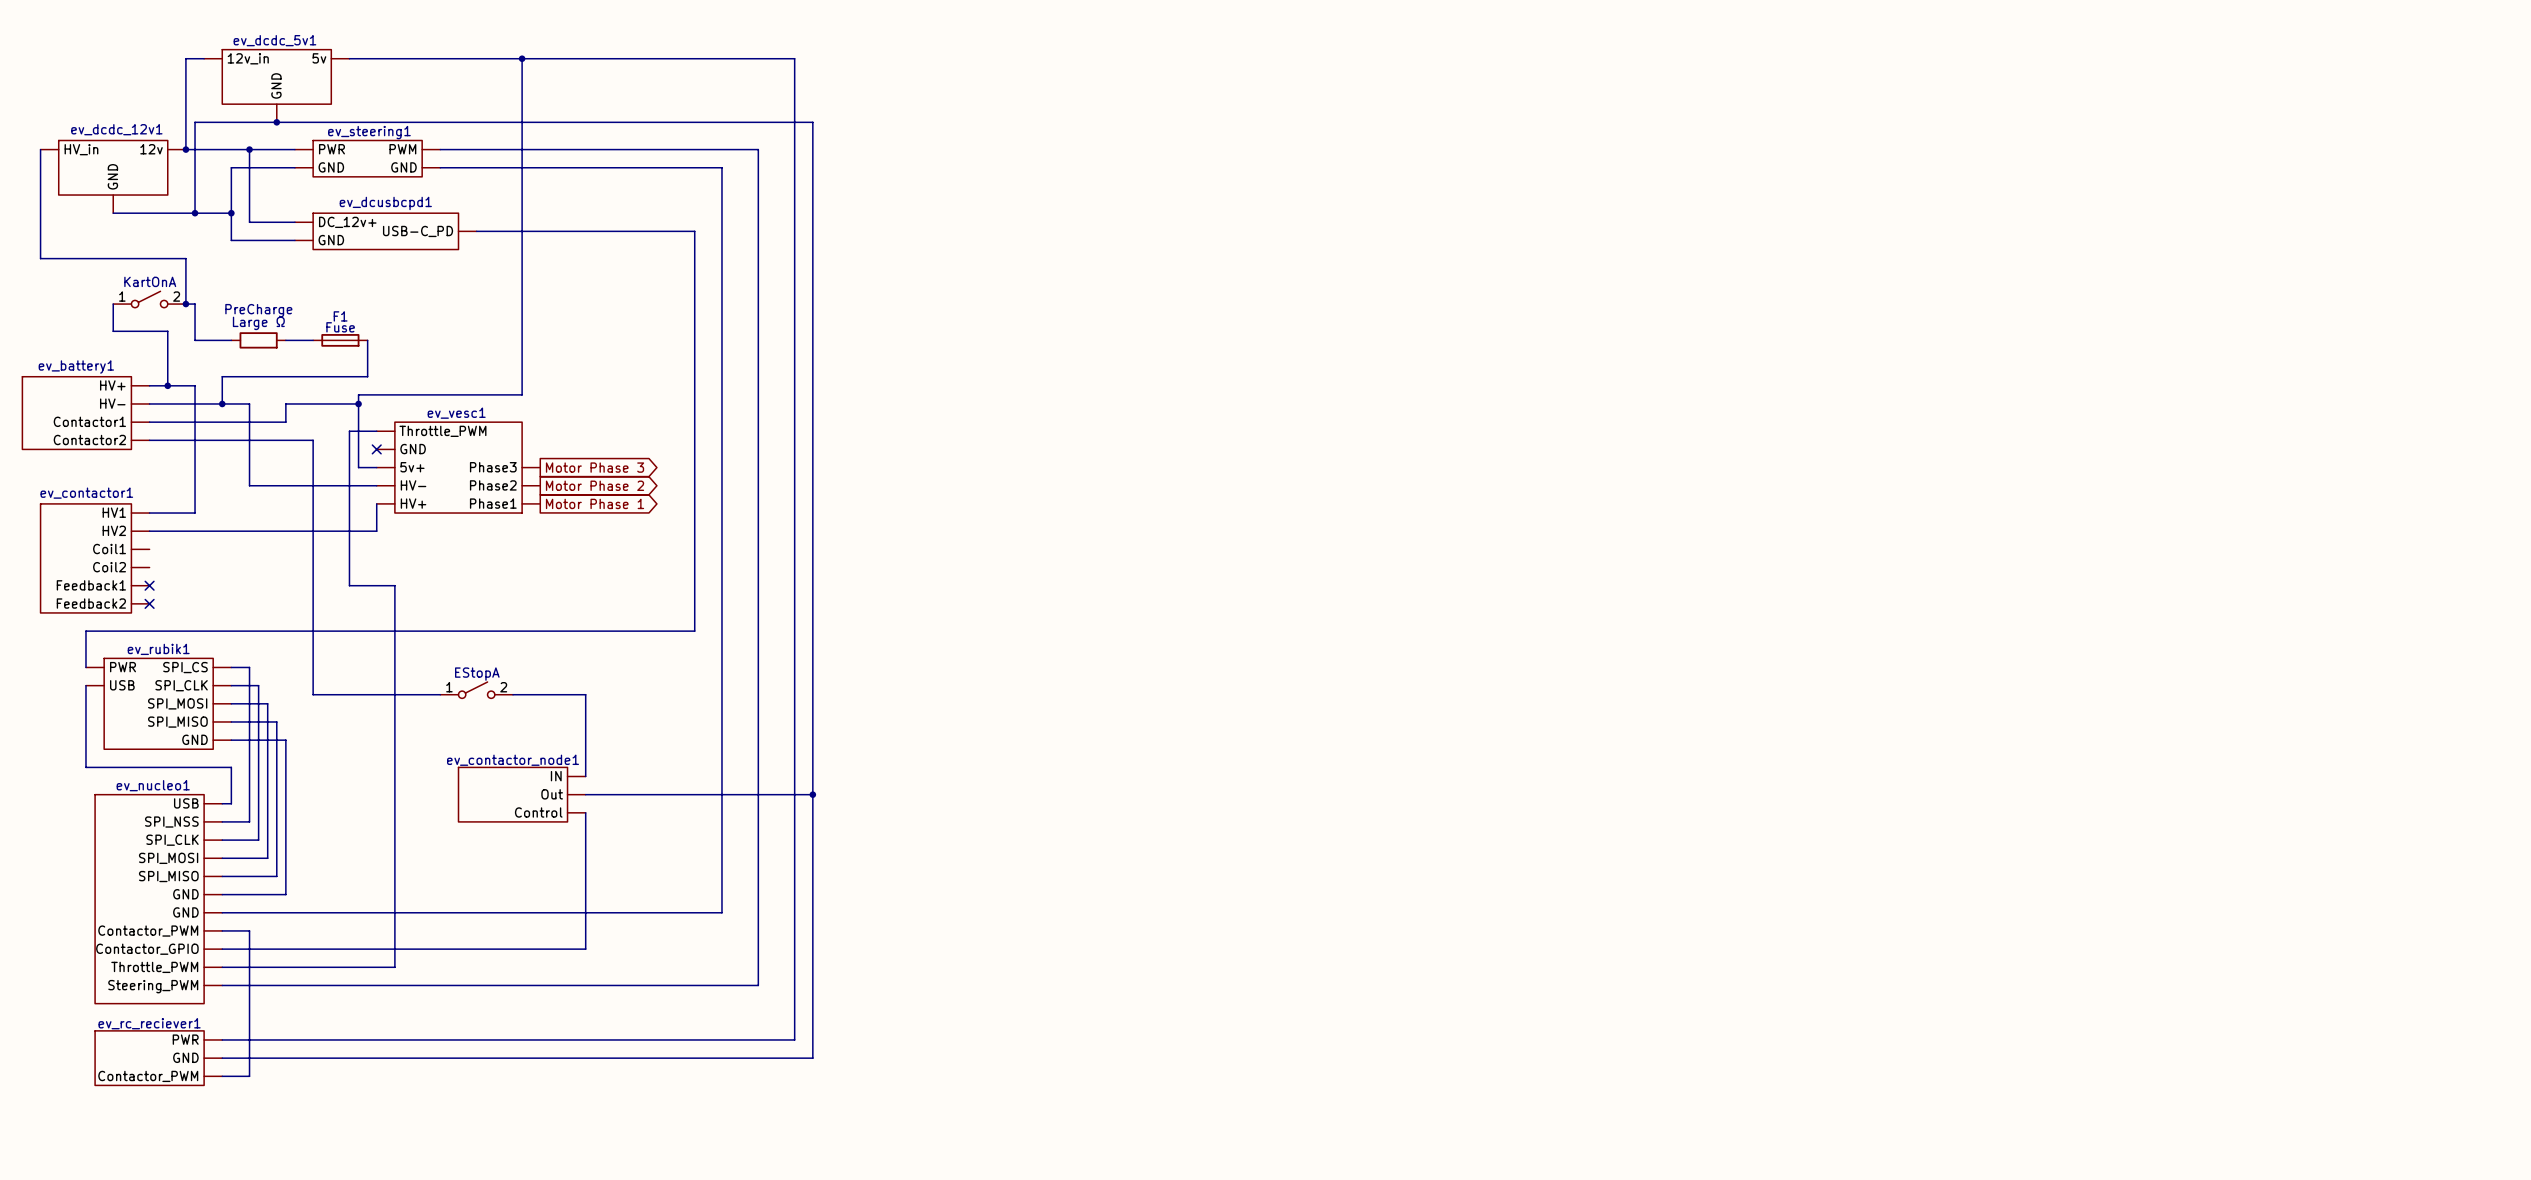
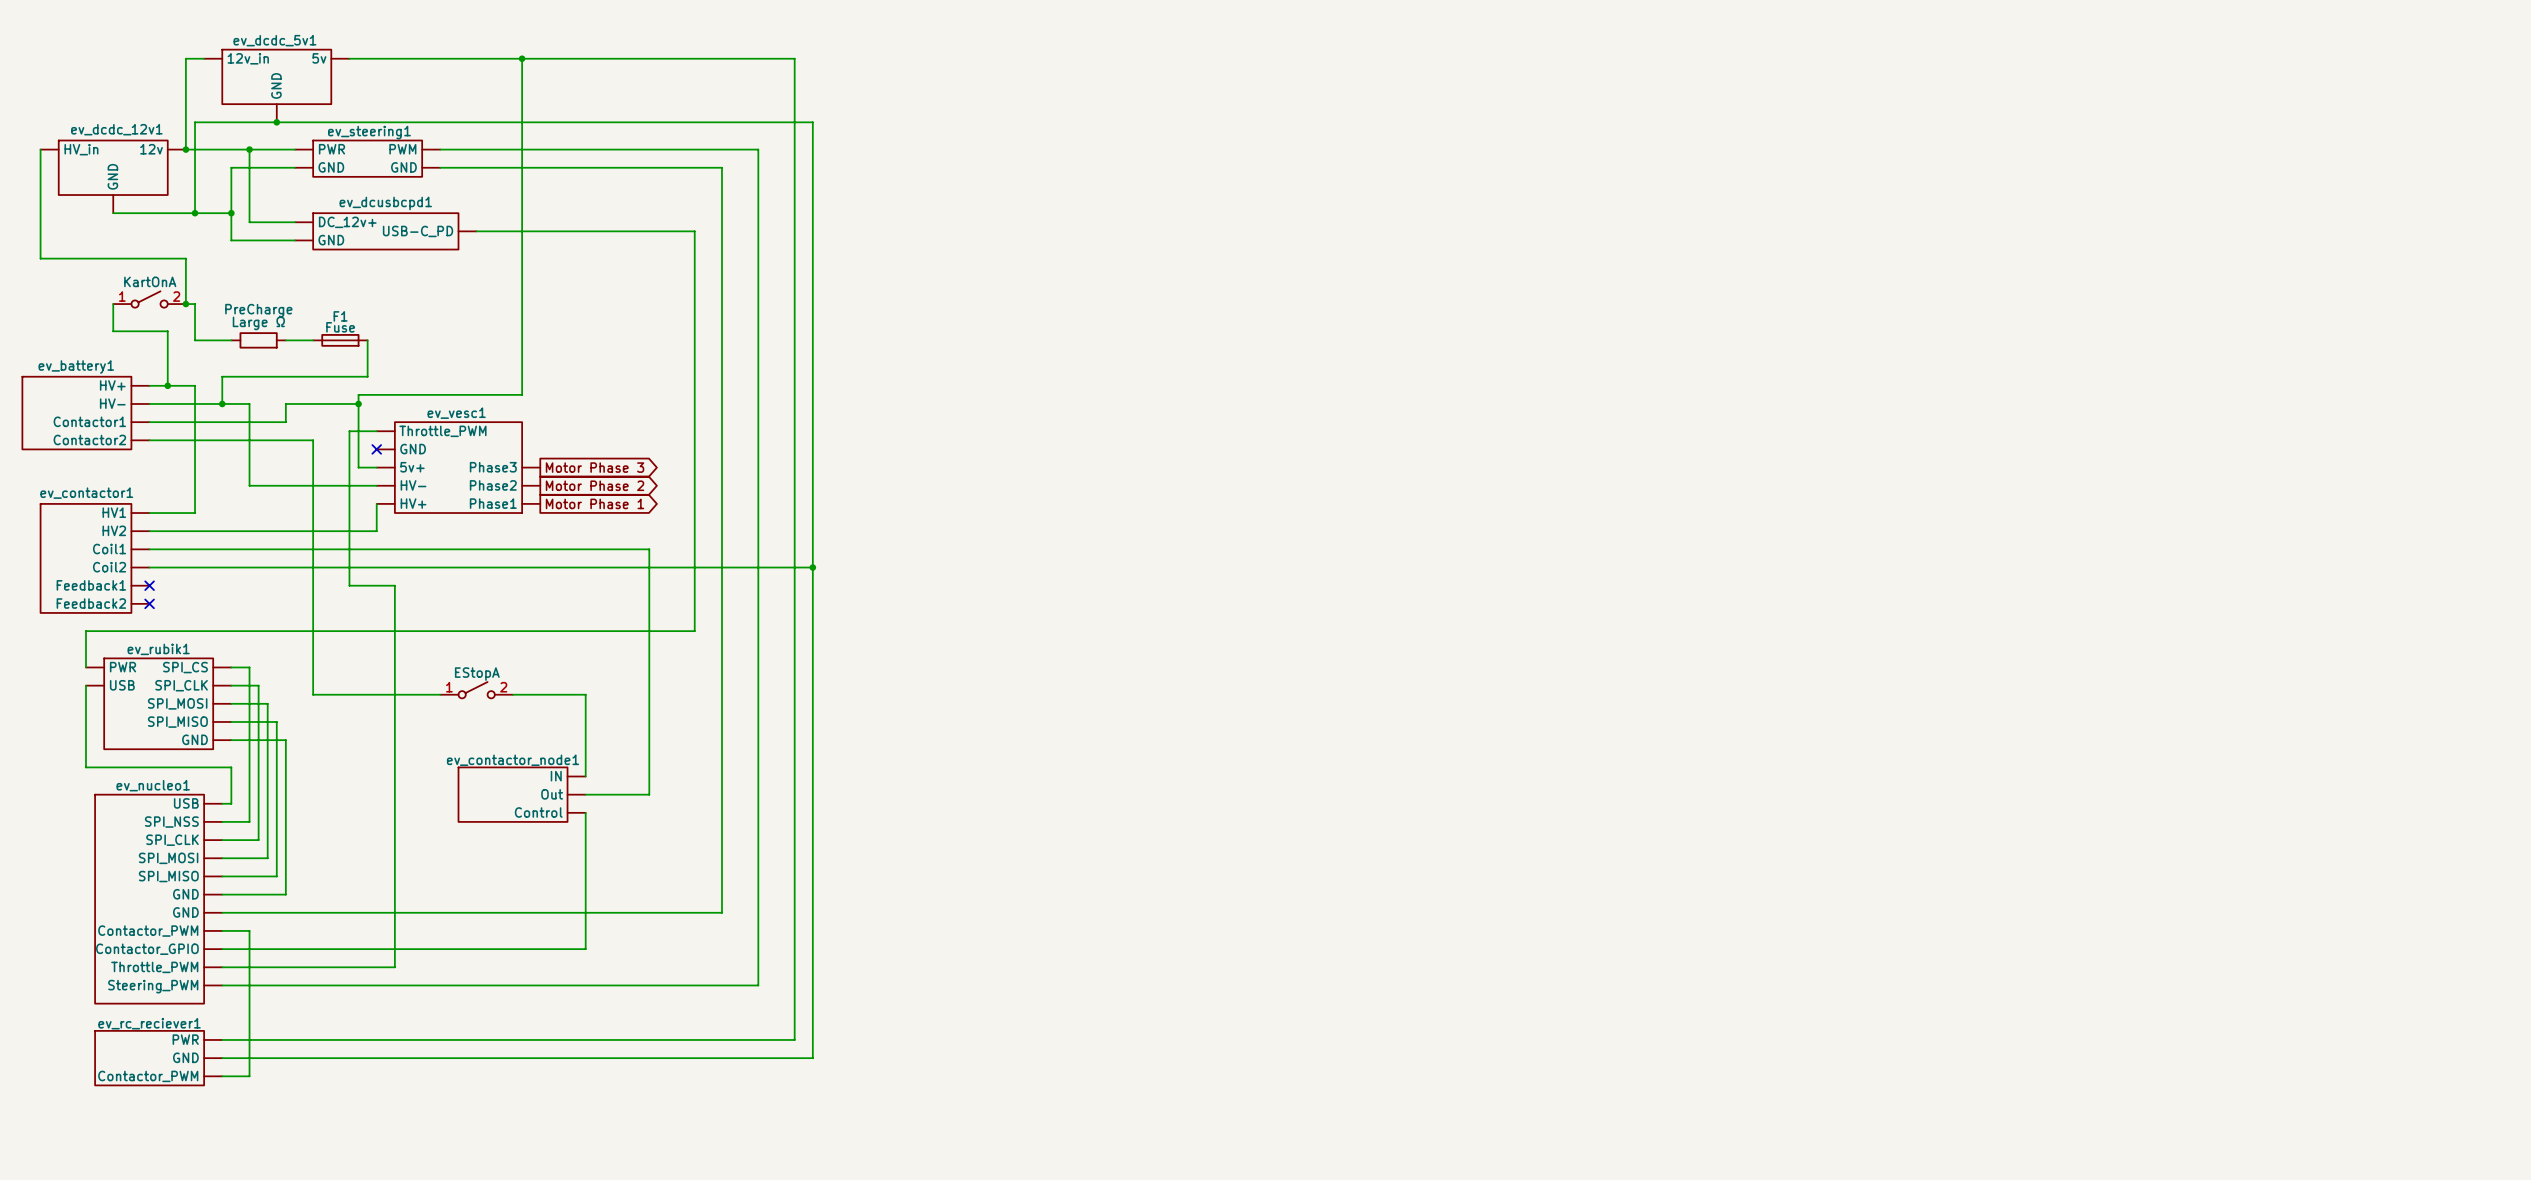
wire: none -> (149, 567) (812, 567)
junction: none -> (812, 567)
wire: (649, 794) (812, 794) -> (649, 794) (649, 549) (149, 549)
junction: (812, 794) -> none

